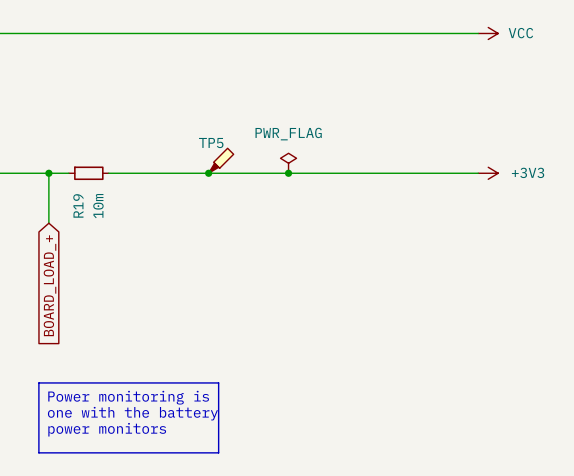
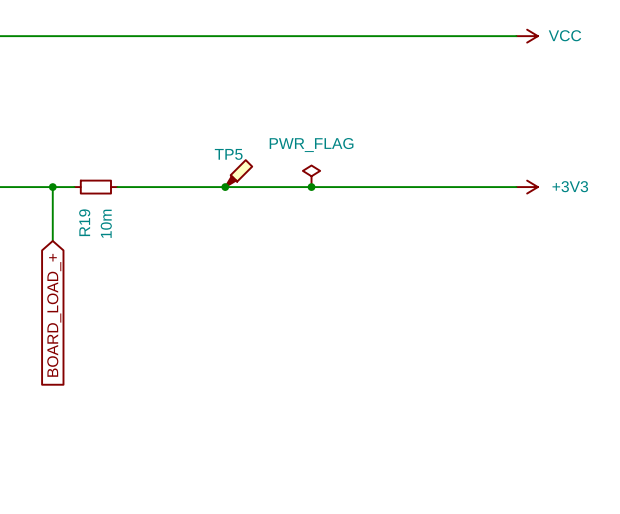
line: (38, 382) (218, 382) (218, 452) (38, 452) (38, 382) -> none
text: Power monitoring is (128, 397) -> none
text: one with the battery (132, 413) -> none
text: power monitors (107, 429) -> none

